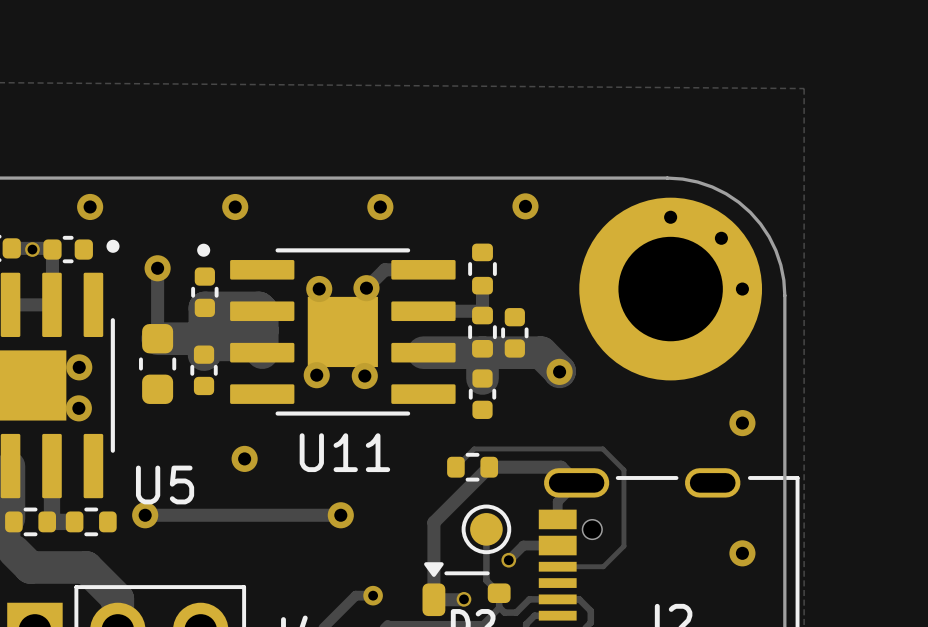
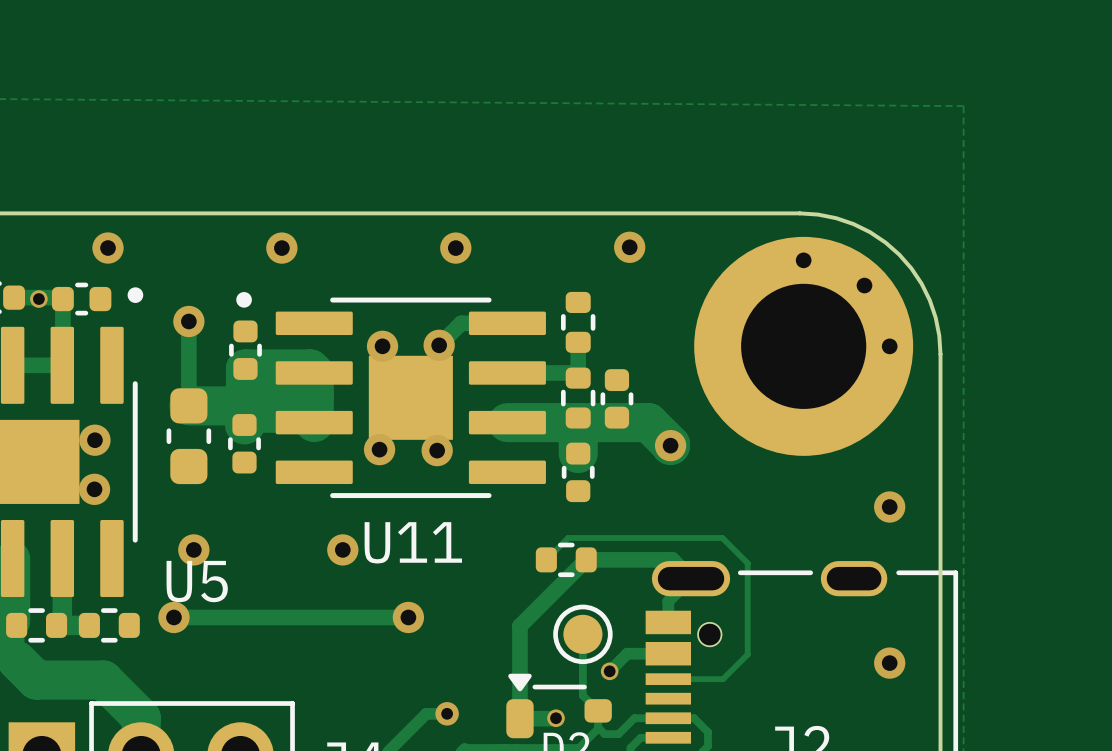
via: none -> (193, 549)
via: (244, 458) -> none
via: none -> (342, 549)

